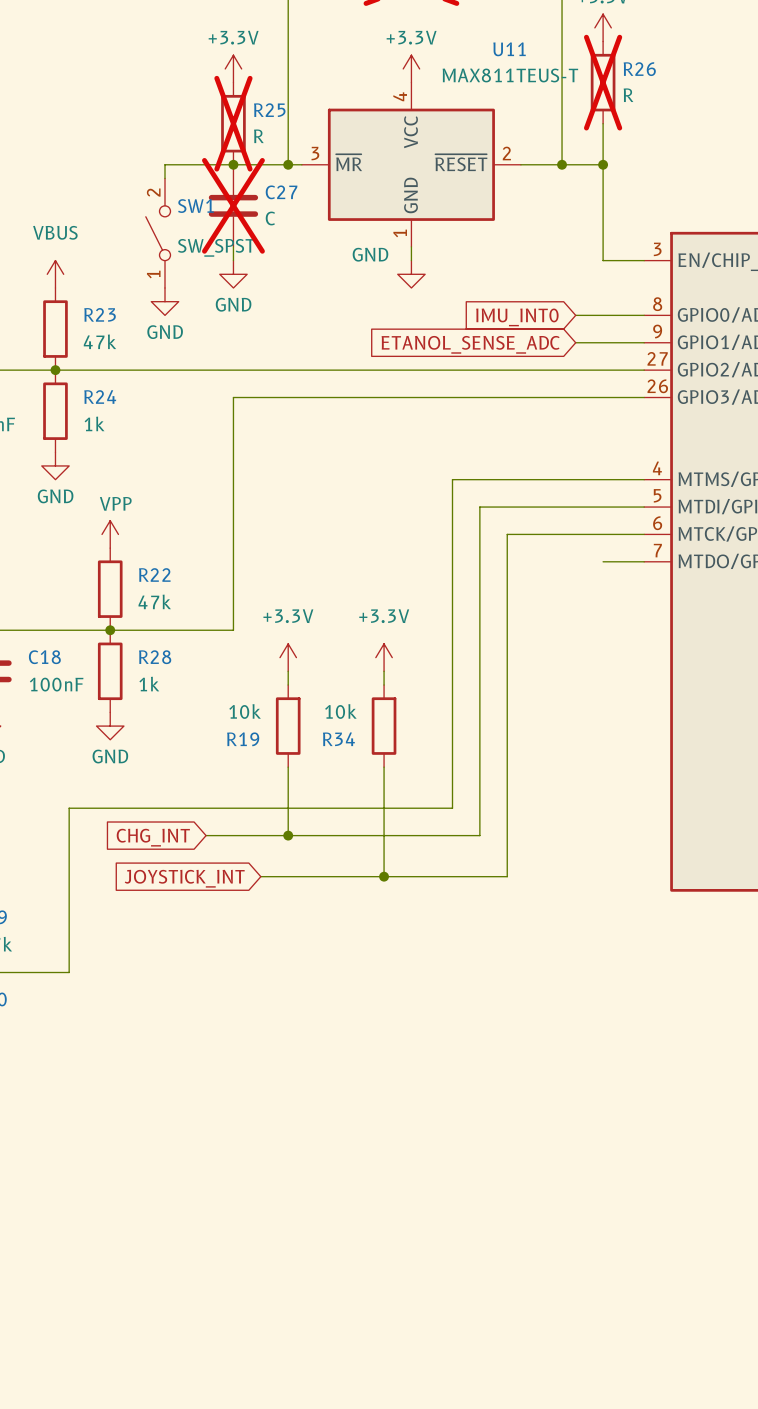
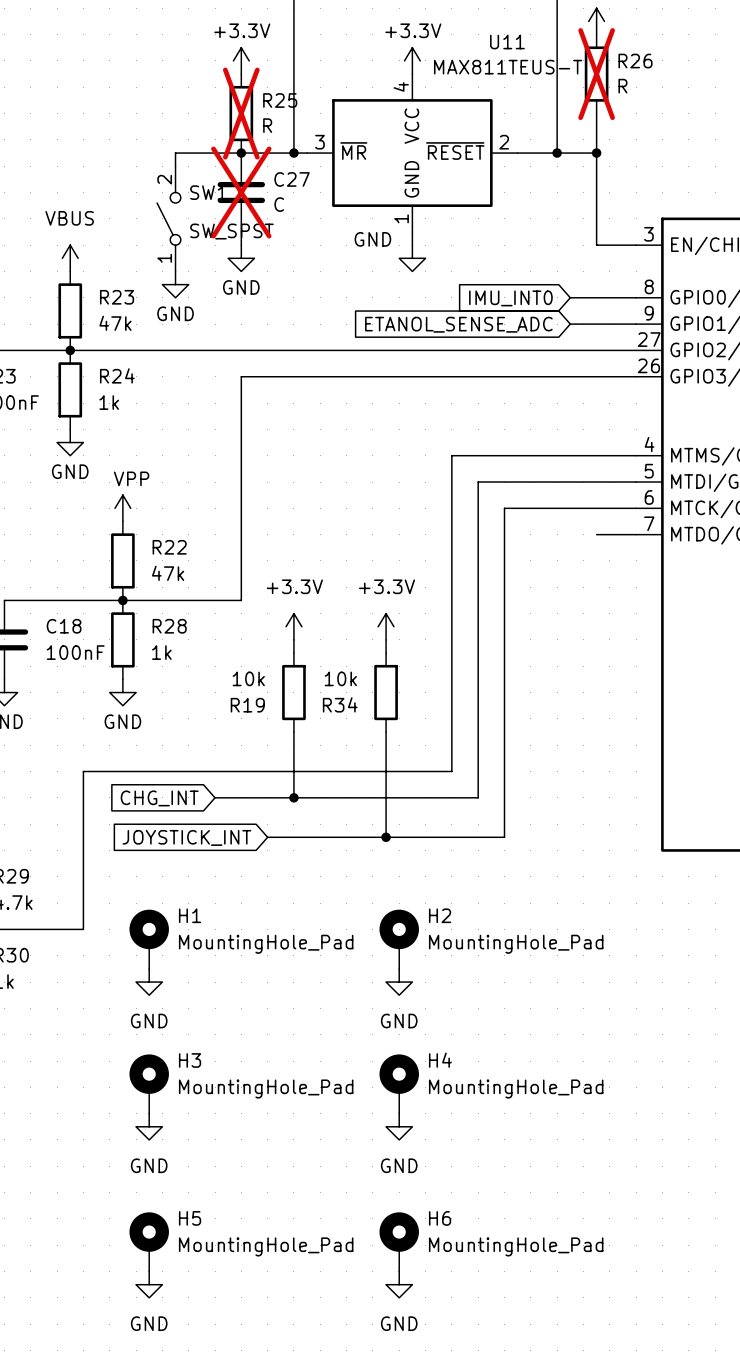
H1: none -> MountingHole_Pad (149, 939)
H2: none -> MountingHole_Pad (399, 939)
power symbol: none -> GND (149, 982)
power symbol: none -> GND (399, 982)
H3: none -> MountingHole_Pad (149, 1084)
H4: none -> MountingHole_Pad (399, 1084)
power symbol: none -> GND (149, 1126)
power symbol: none -> GND (399, 1126)
H5: none -> MountingHole_Pad (149, 1241)
H6: none -> MountingHole_Pad (399, 1241)
power symbol: none -> GND (149, 1284)
power symbol: none -> GND (399, 1284)

